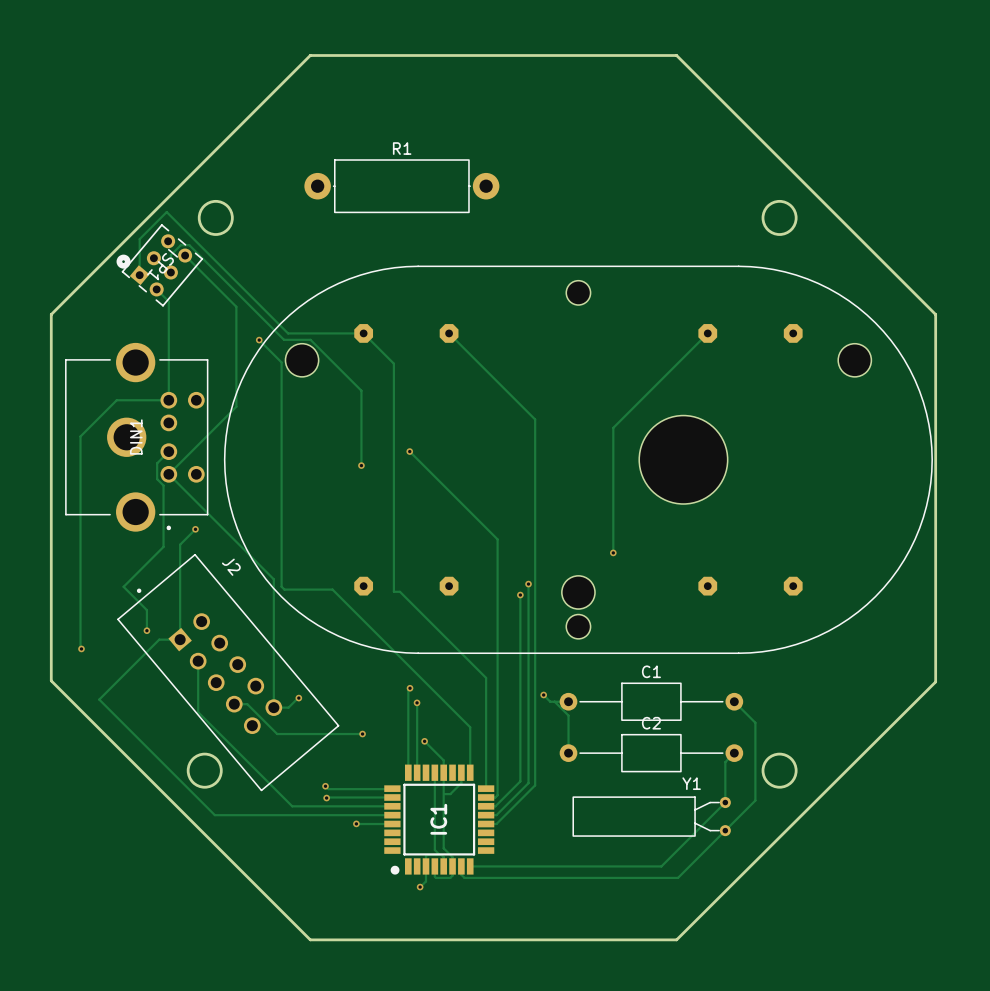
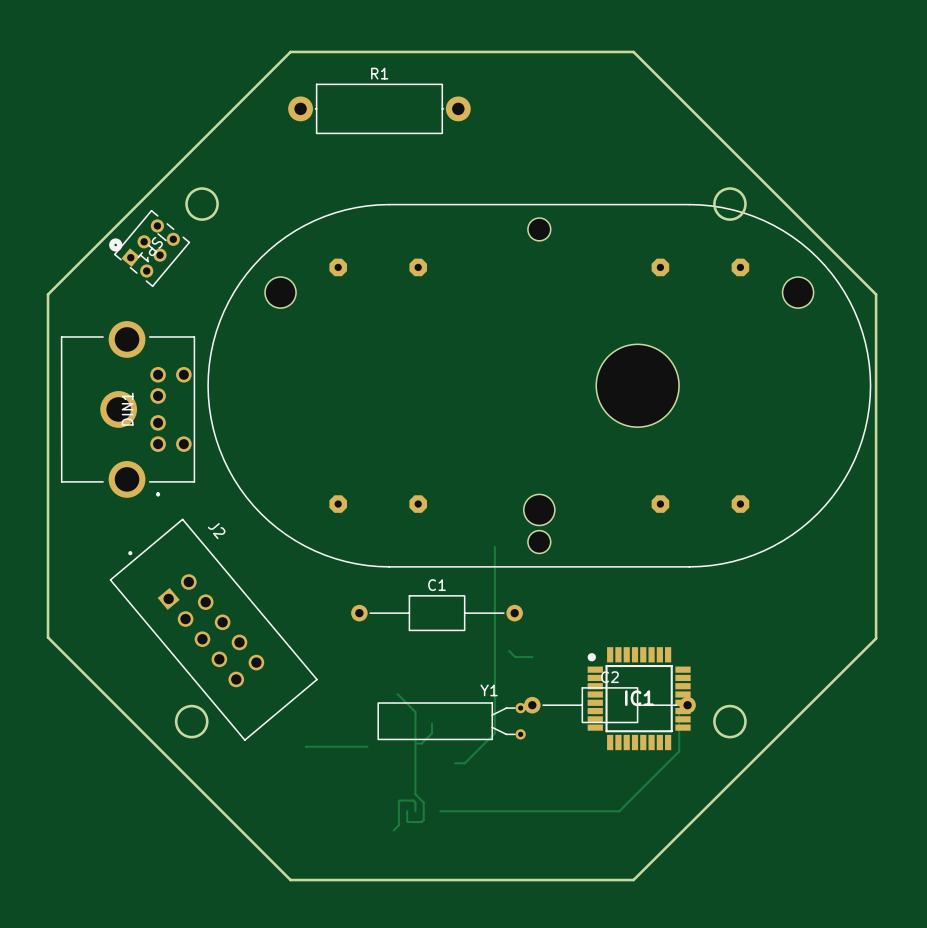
R1 position: (401, 186) -> (379, 108)
track: (185, 255) (236, 306) (236, 406) (168, 474) (273, 579) (273, 707) (288, 707) (298, 698) -> none
track: (170, 272) (170, 255) (180, 245) (189, 245) (284, 339) (310, 339) (361, 390) (361, 465) -> none
track: (139, 275) (139, 239) (166, 212) (288, 333) (363, 333) (393, 363) (393, 591) (399, 591) (486, 677) (486, 788) -> none
track: (156, 289) (168, 301) (168, 400) (116, 400) (80, 436) (81, 648) -> none
track: (449, 333) (535, 419) (535, 785) (496, 824) (486, 824) -> none
track: (707, 333) (613, 427) (613, 552) -> none
track: (259, 340) (281, 362) (281, 586) (284, 589) (332, 589) (470, 727) (470, 772) -> none
via: (259, 340) -> none
track: (168, 451) (157, 463) (157, 479) (163, 485) (163, 546) (123, 586) (146, 610) (146, 630) -> none
track: (409, 451) (497, 539) (497, 795) (495, 797) (486, 797) -> none
via: (409, 451) -> none
part position: (578, 459) -> (539, 385)
via: (361, 465) -> none
track: (195, 529) (180, 544) (180, 639) (159, 639) (99, 699) (214, 815) (392, 815) -> none
via: (195, 529) -> none
via: (613, 552) -> none
via: (528, 584) -> none
track: (520, 595) (520, 781) (495, 806) (486, 806) -> none
via: (520, 595) -> none
via: (146, 630) -> none
via: (81, 648) -> none
track: (198, 661) (198, 712) (292, 806) (392, 806) -> none
track: (410, 688) (408, 689) (408, 772) -> none
via: (410, 688) -> none
via: (543, 694) -> none
via: (298, 698) -> none
track: (554, 701) (568, 715) (568, 753) -> none
C1 position: (651, 701) -> (437, 613)
track: (734, 701) (755, 722) (755, 800) (678, 877) (464, 877) (461, 874) (461, 866) -> none
track: (417, 702) (417, 772) -> none
via: (417, 702) -> none
track: (234, 704) (247, 704) (277, 734) (362, 734) -> none
via: (362, 734) -> none
via: (424, 741) -> none
track: (434, 772) (434, 850) (439, 854) -> none
track: (325, 786) (328, 789) (392, 788) -> none
via: (325, 786) -> none
via: (326, 798) -> none
Y1 position: (651, 816) -> (451, 721)
IC1 rotation: 0° (439, 819) -> 90° clockwise (639, 698)
IC1 position: (439, 819) -> (639, 698)
via: (356, 823) -> none
track: (356, 824) (392, 824) -> none
via: (420, 887) -> none

